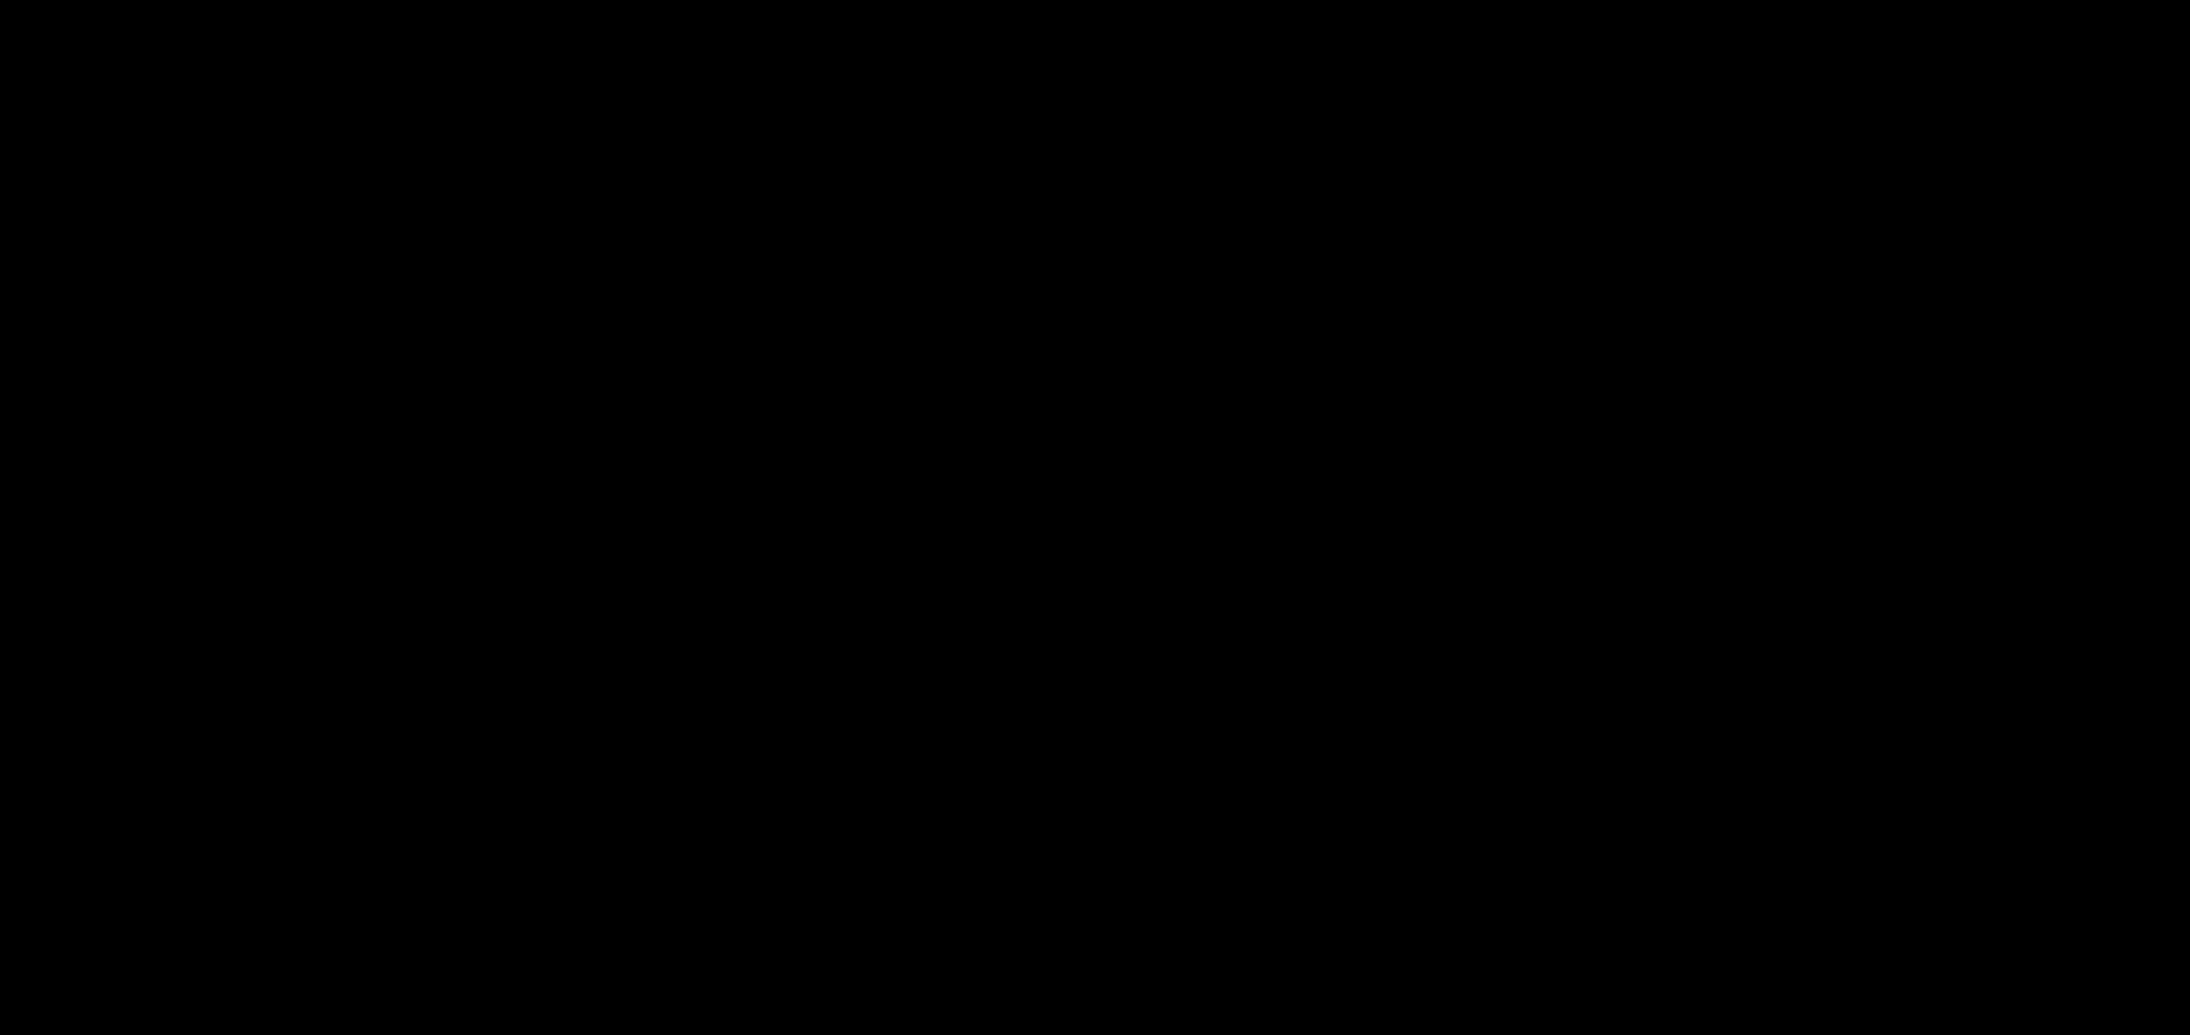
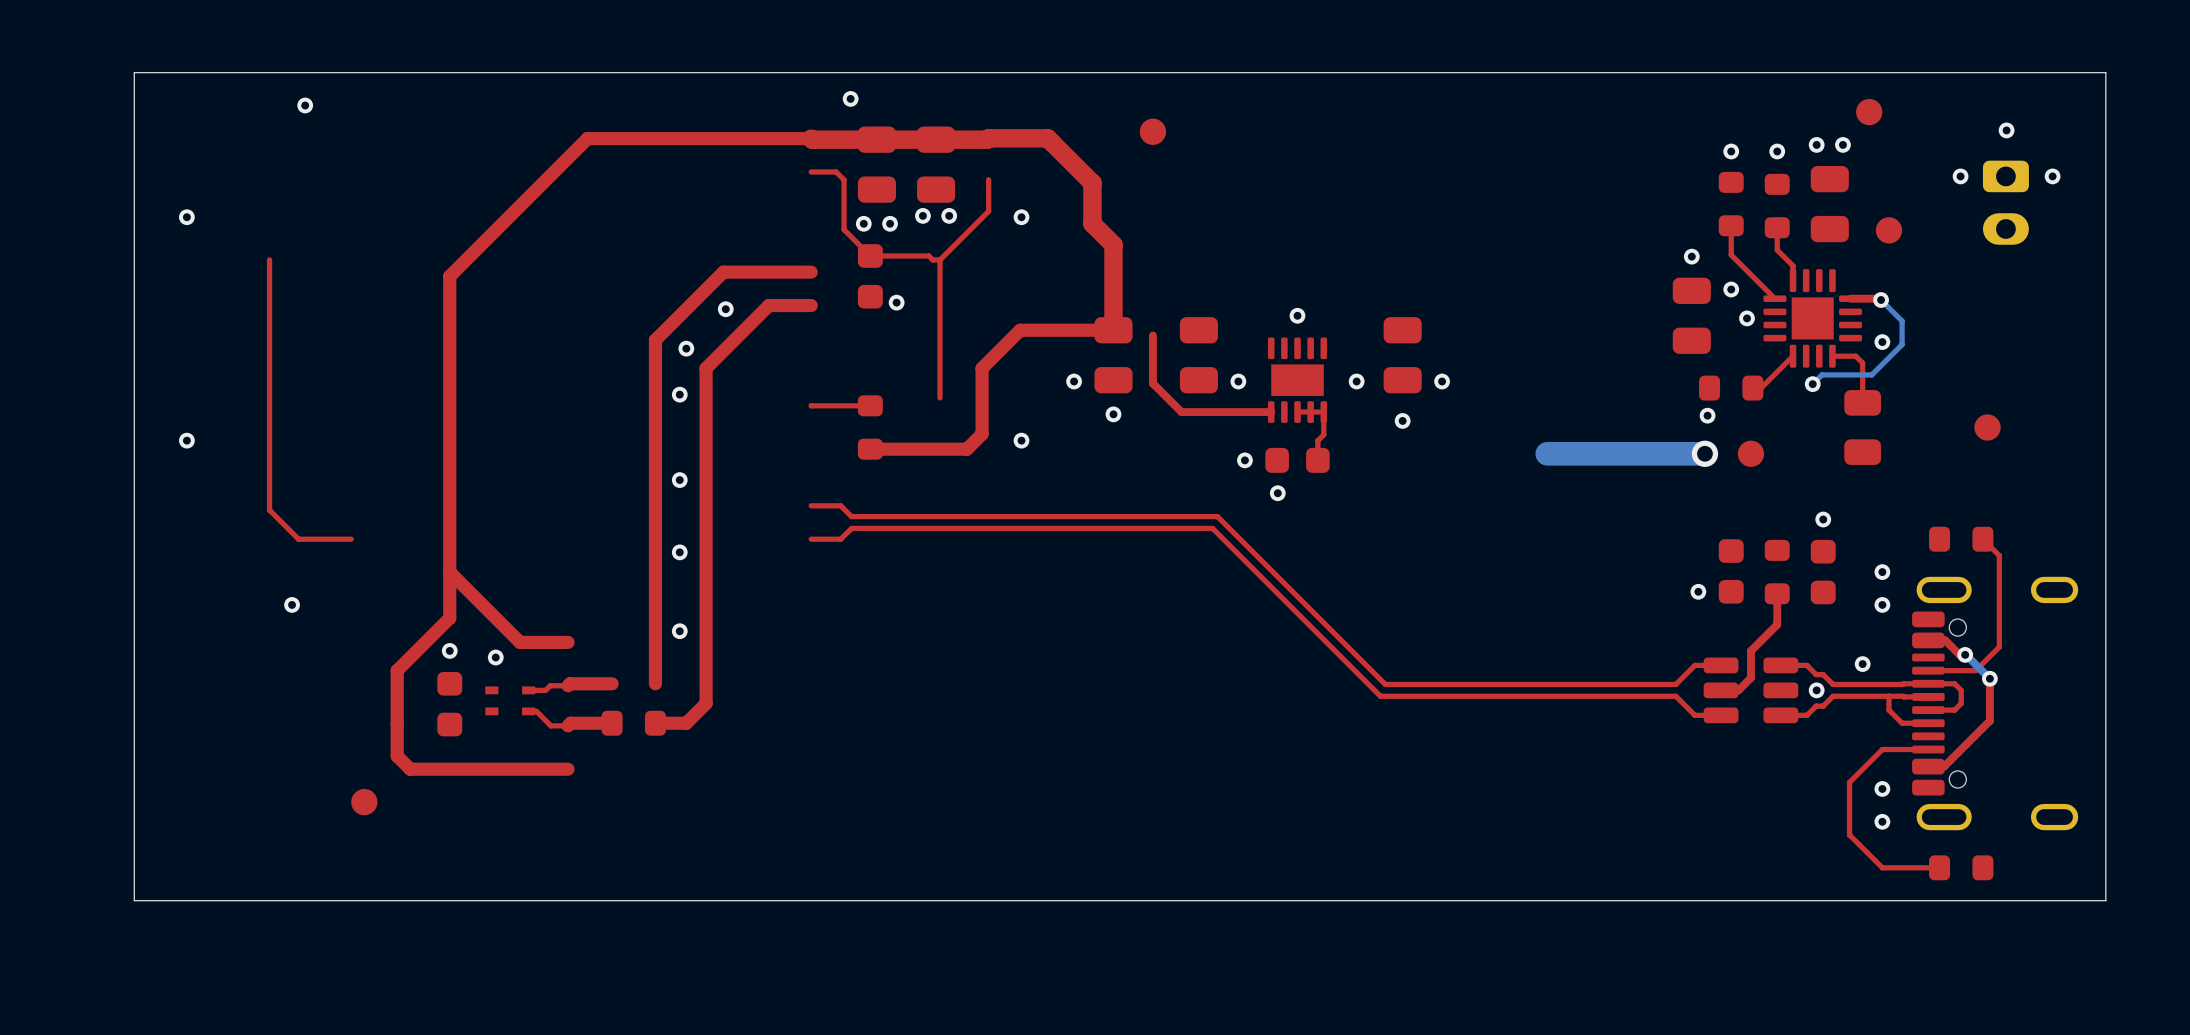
board edge: none -> (2105, 72) (2105, 900) (134, 900) (134, 72) (2105, 72)
via: none -> (850, 98)
via: none -> (305, 105)
part: none -> (1869, 112)
via: none -> (2006, 130)
part: none -> (1152, 131)
via: none -> (1816, 144)
via: none -> (1842, 144)
via: none -> (1731, 151)
via: none -> (1777, 151)
part: none -> (876, 164)
part: none -> (936, 164)
top track: none -> (811, 172) (836, 172) (844, 179) (844, 229) (870, 255) (928, 255) (932, 259) (940, 259)
via: none -> (1960, 176)
via: none -> (2052, 176)
top track: none -> (988, 179) (988, 211) (940, 259)
part: none -> (2005, 202)
part: none -> (1731, 204)
part: none -> (1829, 204)
part: none -> (1777, 206)
via: none -> (922, 215)
via: none -> (949, 215)
via: none -> (186, 217)
via: none -> (1021, 217)
via: none -> (863, 223)
via: none -> (890, 223)
top track: none -> (1731, 225) (1731, 255) (1774, 298)
top track: none -> (1777, 227) (1777, 250) (1793, 265) (1793, 280)
part: none -> (1888, 230)
via: none -> (1691, 256)
top track: none -> (269, 259) (269, 510) (298, 539) (351, 539)
top track: none -> (940, 259) (940, 397)
top track: none -> (811, 272) (723, 272) (655, 340) (655, 683)
part: none -> (870, 276)
via: none -> (1731, 289)
top track: none -> (1850, 298) (1881, 300)
bottom track: none -> (1881, 300) (1902, 321) (1902, 344) (1871, 374) (1821, 374) (1812, 384)
via: none -> (1881, 300)
via: none -> (896, 302)
top track: none -> (811, 305) (768, 305) (706, 368) (706, 703) (686, 723) (655, 723)
via: none -> (725, 309)
via: none -> (1297, 315)
part: none -> (1691, 315)
via: none -> (1747, 318)
part: none -> (1812, 318)
top track: none -> (1152, 335) (1152, 383) (1181, 412) (1271, 412)
via: none -> (1882, 342)
via: none -> (686, 348)
part: none -> (1113, 355)
part: none -> (1198, 355)
part: none -> (1402, 355)
top track: none -> (1793, 356) (1761, 388) (1752, 388)
top track: none -> (1832, 356) (1855, 356) (1862, 363) (1862, 402)
part: none -> (1297, 380)
via: none -> (1074, 381)
via: none -> (1238, 381)
via: none -> (1356, 381)
via: none -> (1442, 381)
via: none -> (1812, 384)
part: none -> (1731, 388)
via: none -> (679, 394)
top track: none -> (870, 405) (811, 405)
top track: none -> (1297, 412) (1323, 412) (1323, 434) (1317, 440) (1317, 460) (1323, 454)
via: none -> (1113, 414)
via: none -> (1707, 415)
via: none -> (1402, 420)
part: none -> (870, 427)
part: none -> (1862, 427)
part: none -> (1987, 427)
via: none -> (186, 440)
via: none -> (1021, 440)
top track: none -> (870, 449) (966, 449) (982, 434) (982, 368) (1020, 330) (1113, 330) (1113, 244) (1092, 223) (1092, 183) (1047, 138) (587, 138) (449, 276) (449, 618) (397, 670) (397, 756) (410, 769) (568, 769)
bottom track: none -> (1704, 453) (1547, 453)
via: none -> (1704, 453)
part: none -> (1750, 453)
via: none -> (1244, 460)
part: none -> (1297, 460)
via: none -> (679, 480)
via: none -> (1277, 493)
top track: none -> (811, 505) (840, 505) (851, 516) (1217, 516) (1385, 684) (1675, 684) (1694, 665) (1721, 665)
via: none -> (1823, 519)
top track: none -> (811, 539) (840, 539) (851, 528) (1212, 528) (1380, 696) (1675, 696) (1694, 715) (1721, 715)
part: none -> (1961, 539)
top track: none -> (1982, 539) (1999, 555) (1999, 646) (1975, 670) (1928, 670)
via: none -> (679, 552)
part: none -> (1731, 571)
top track: none -> (449, 572) (520, 642) (568, 642)
part: none -> (1777, 572)
part: none -> (1823, 572)
via: none -> (1882, 572)
via: none -> (1698, 591)
top track: none -> (1777, 593) (1777, 624) (1750, 650) (1750, 677) (1738, 690) (1721, 690)
via: none -> (292, 604)
via: none -> (1882, 604)
via: none -> (679, 631)
top track: none -> (1928, 640) (1945, 640) (1959, 654) (1965, 654)
via: none -> (449, 650)
bottom track: none -> (1965, 654) (1989, 678)
via: none -> (1965, 654)
via: none -> (495, 657)
via: none -> (1862, 664)
top track: none -> (1780, 665) (1806, 665) (1816, 674) (1823, 674) (1833, 684) (1954, 683) (1961, 690) (1961, 703) (1954, 710) (1928, 710)
top track: none -> (1989, 678) (1989, 720) (1944, 766) (1928, 766)
via: none -> (1989, 678)
top track: none -> (612, 683) (570, 683) (568, 685) (550, 685) (545, 690) (528, 690)
part: none -> (1750, 690)
via: none -> (1816, 690)
top track: none -> (1888, 696) (1888, 710) (1902, 723) (1928, 723)
top track: none -> (1928, 696) (1833, 696) (1823, 706) (1816, 706) (1806, 715) (1780, 715)
part: none -> (510, 700)
part: none -> (1995, 703)
part: none -> (449, 704)
top track: none -> (528, 711) (536, 711) (550, 725) (568, 725) (570, 723) (612, 723)
part: none -> (633, 723)
top track: none -> (1928, 749) (1882, 749) (1849, 782) (1849, 834) (1882, 867) (1939, 867)
via: none -> (1882, 788)
part: none -> (364, 802)
via: none -> (1882, 821)
part: none -> (1961, 867)

